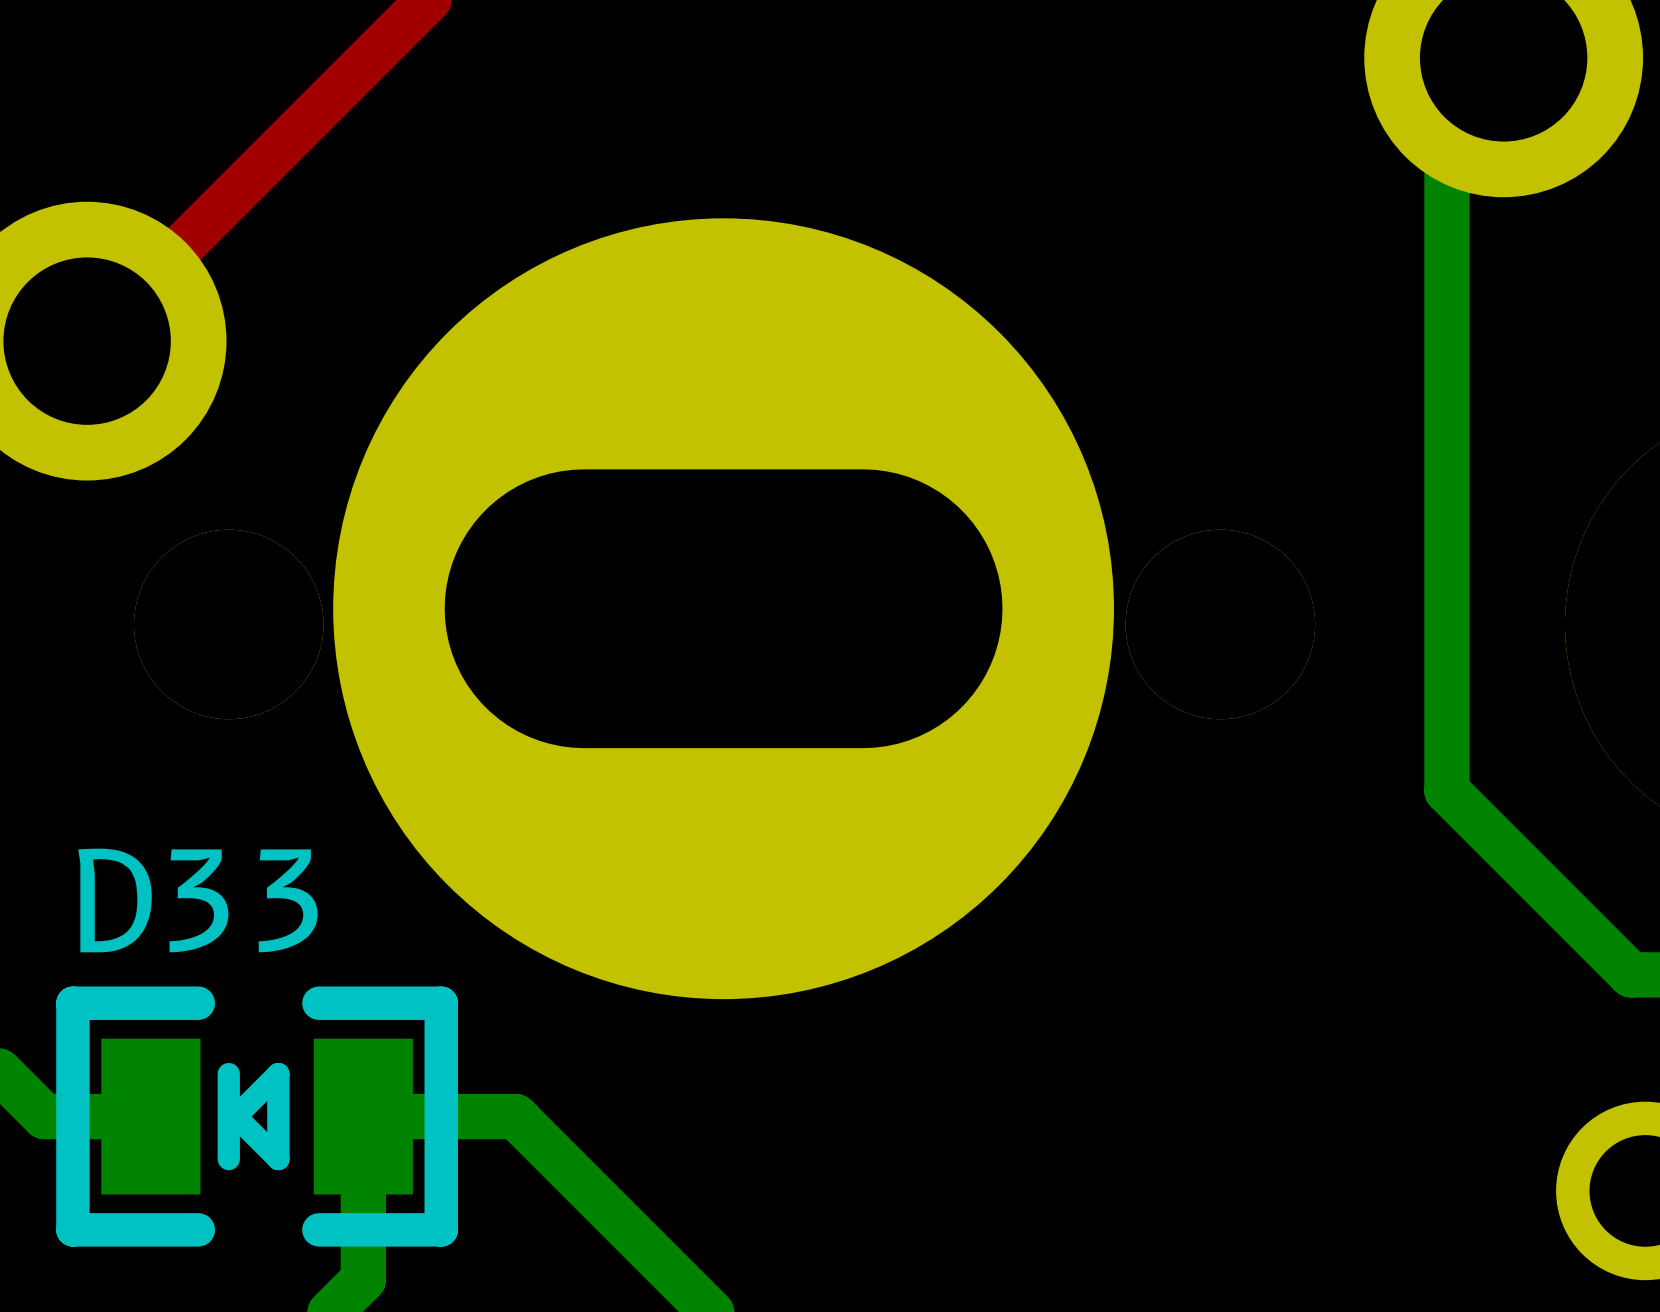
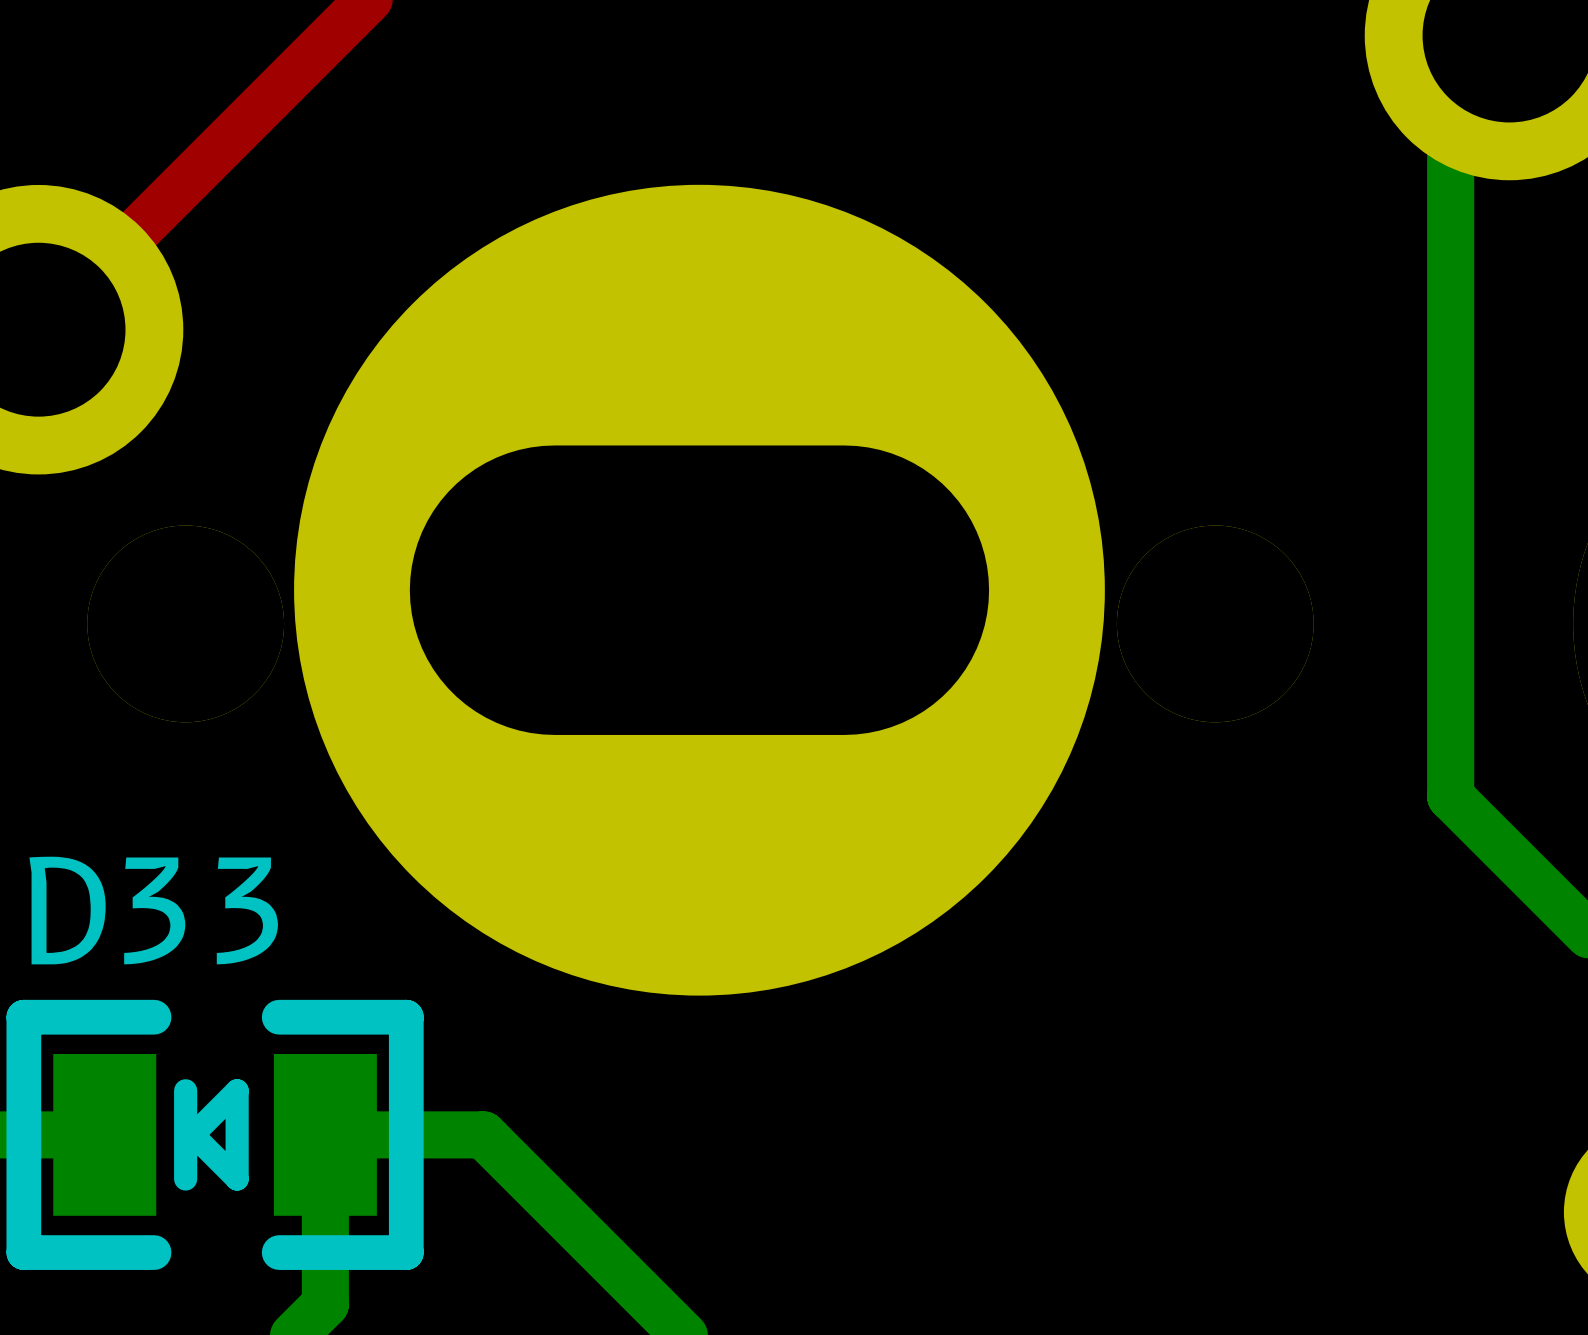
part position: (723, 608) -> (699, 590)

